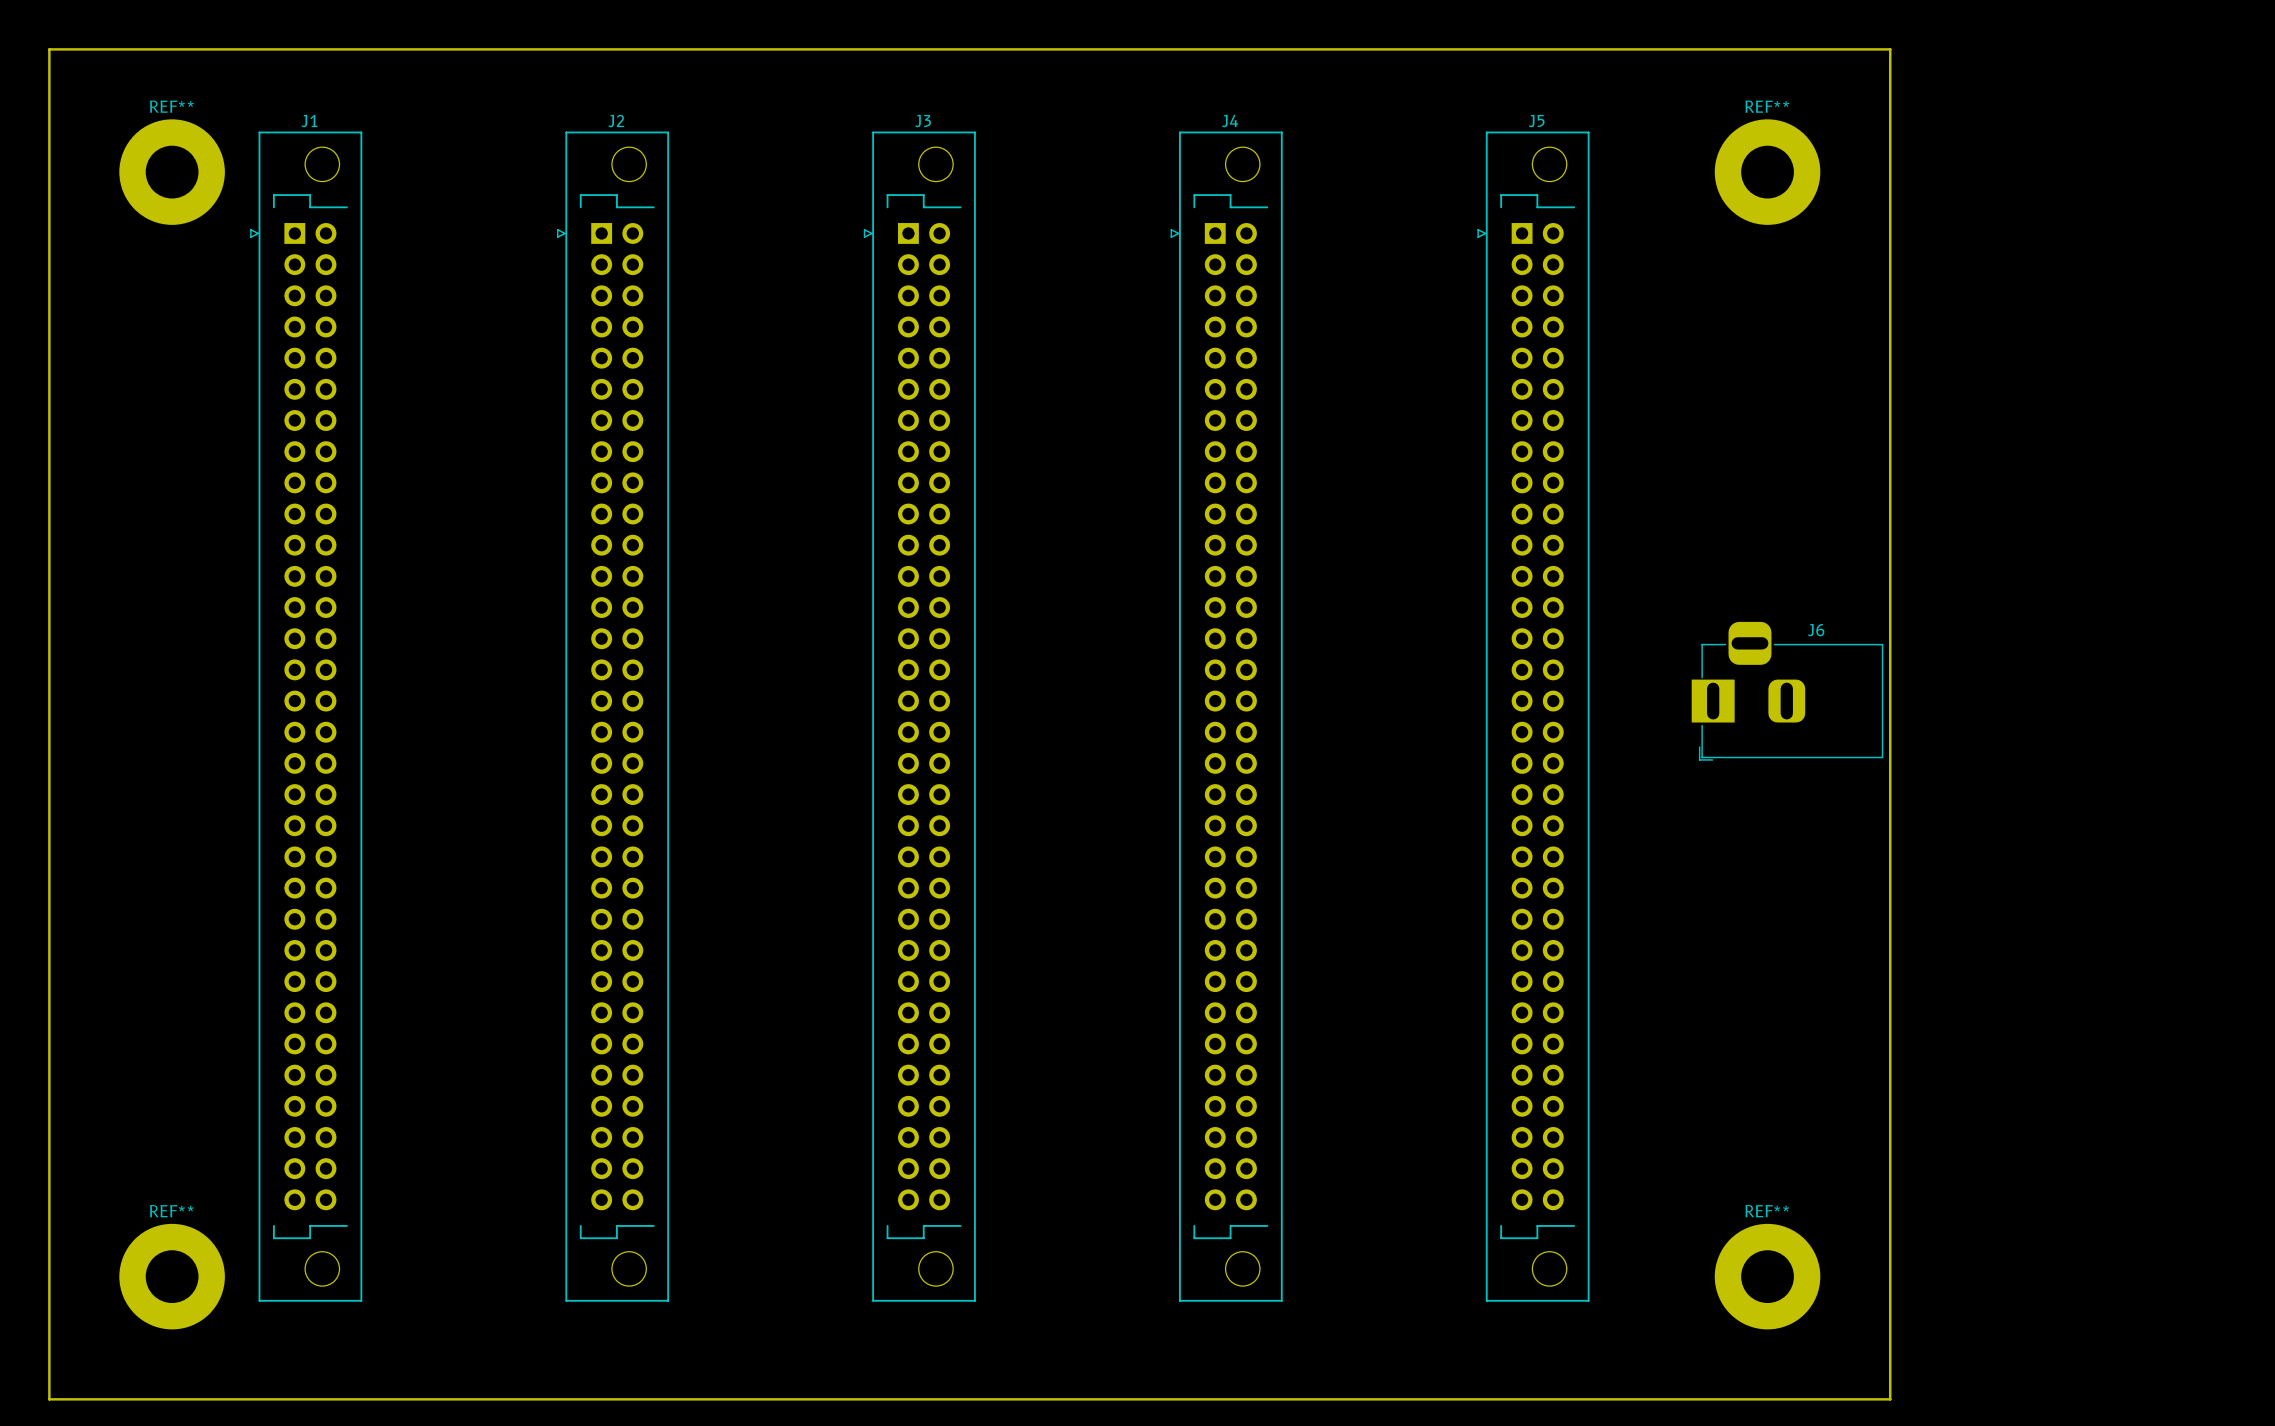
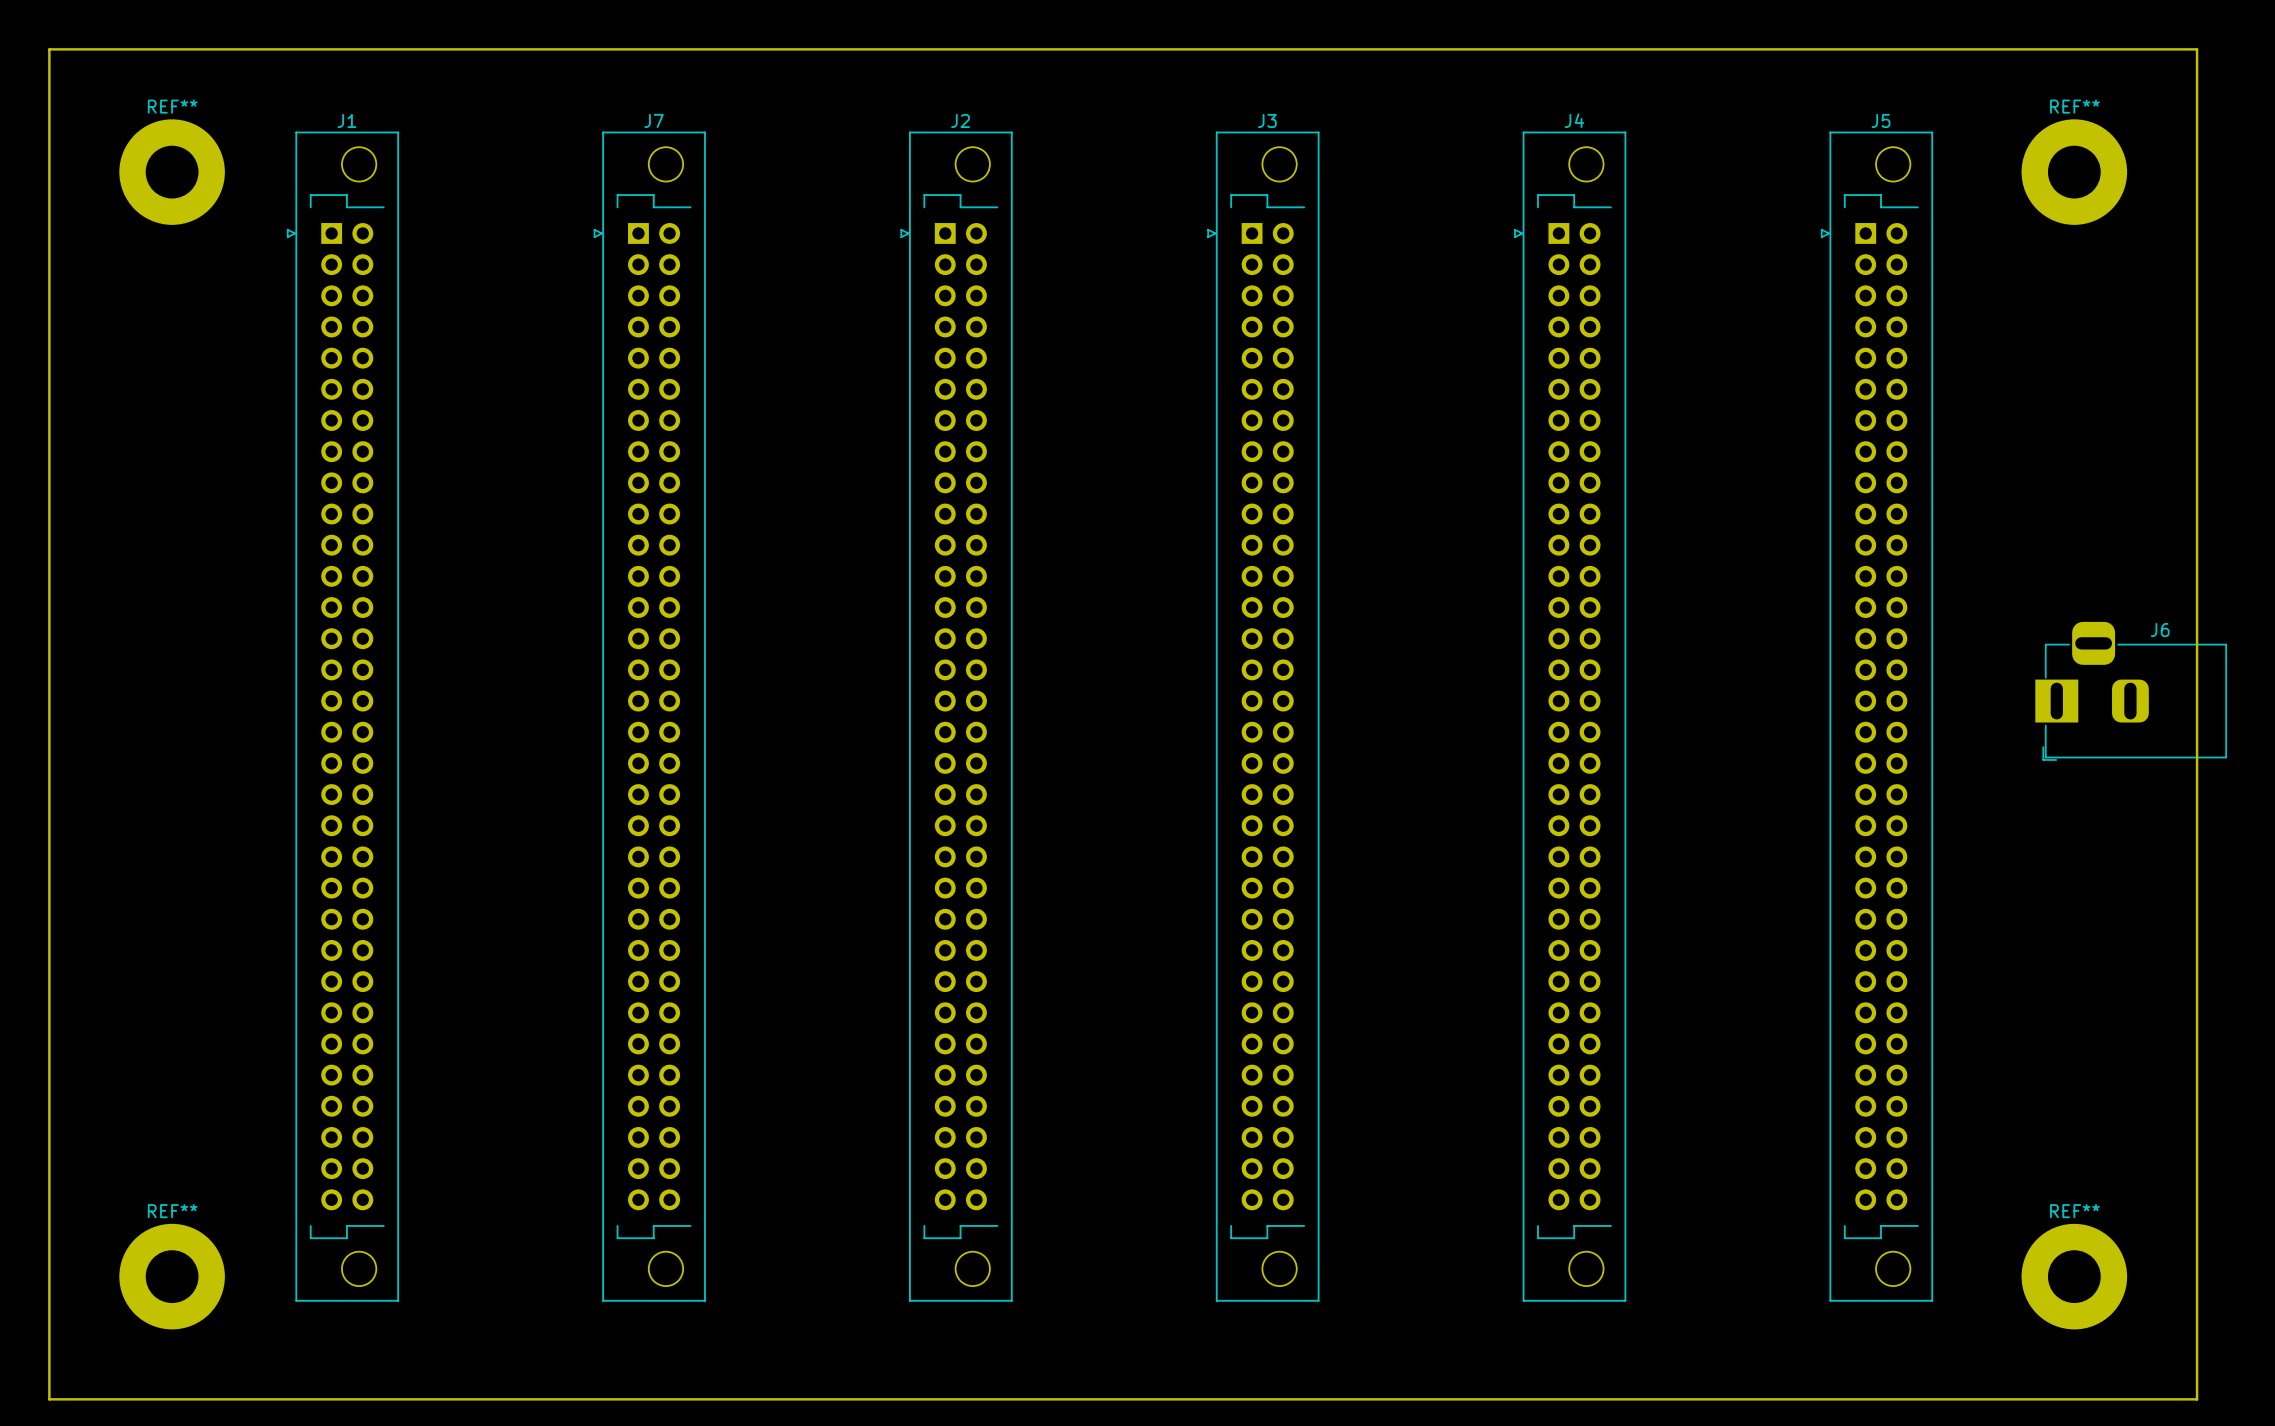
board edge: (1890, 49) (1890, 1399) -> (1890, 49) (2197, 49) (2197, 1399) (1890, 1399)
REF** position: (1767, 172) -> (2074, 172)
J6 position: (1787, 691) -> (2131, 691)
J1 position: (306, 716) -> (343, 716)
J2 position: (613, 716) -> (956, 716)
J7: none -> (649, 716)
J3 position: (919, 716) -> (1263, 716)
J4 position: (1226, 716) -> (1570, 716)
J5 position: (1533, 716) -> (1877, 716)
REF** position: (1767, 1276) -> (2074, 1276)

